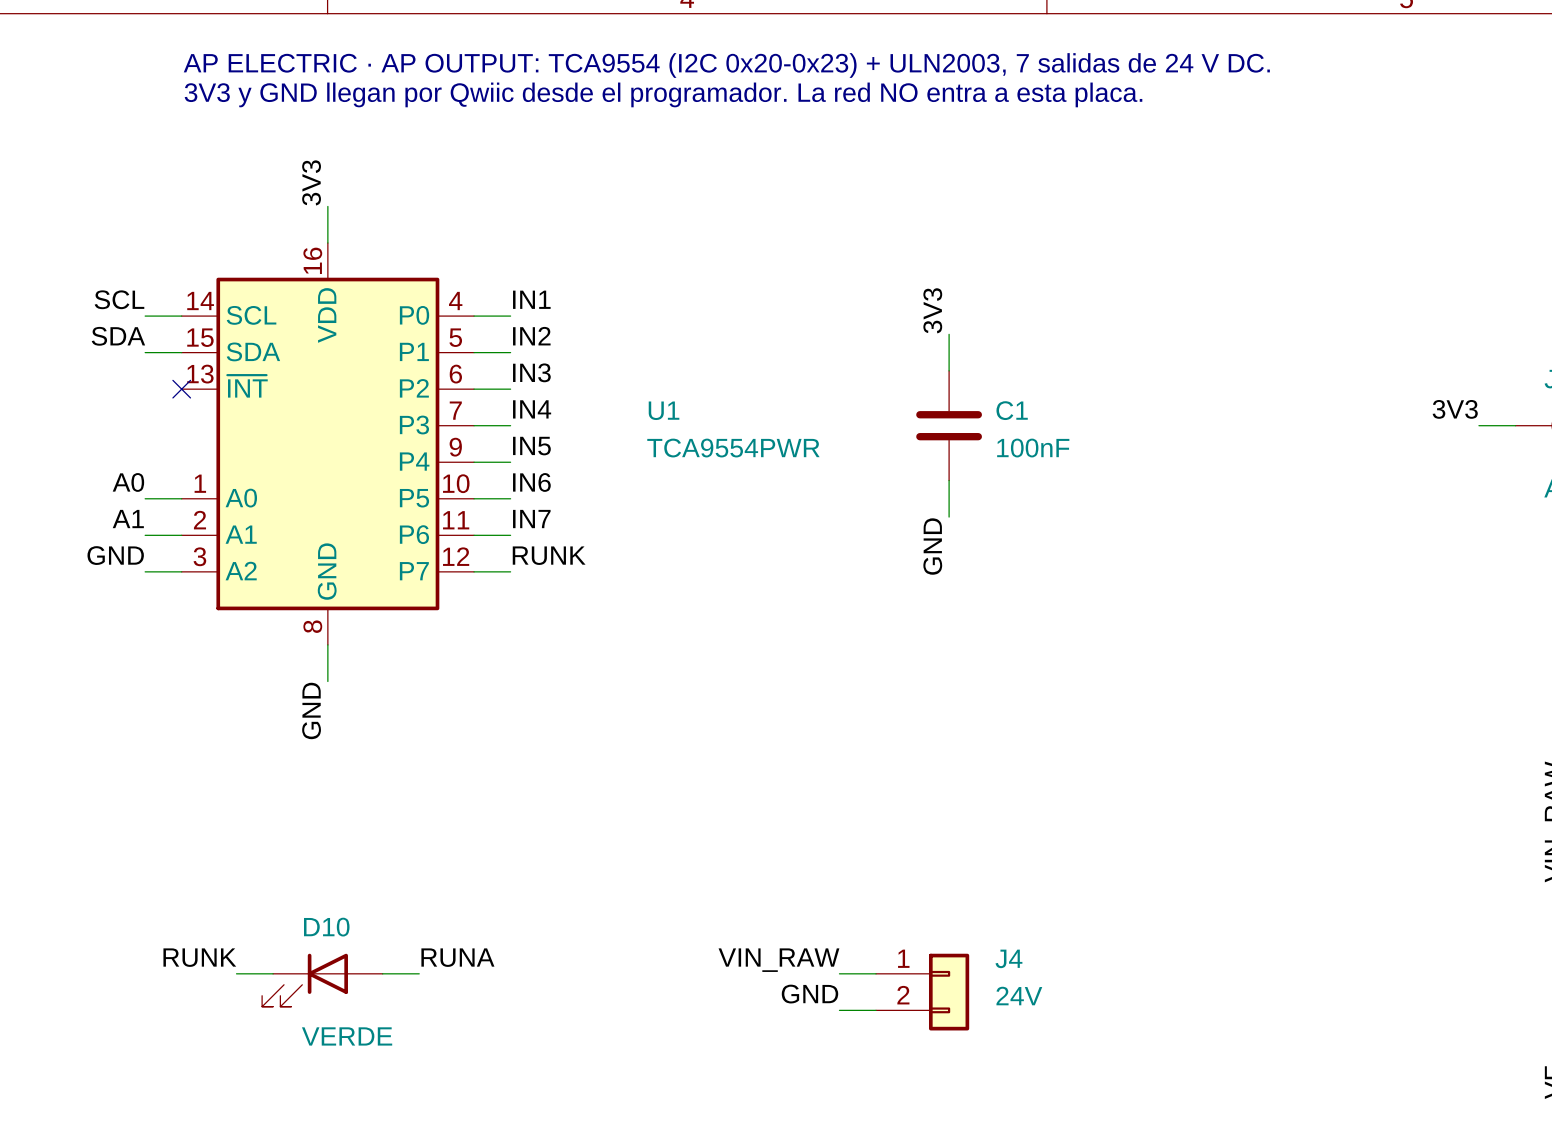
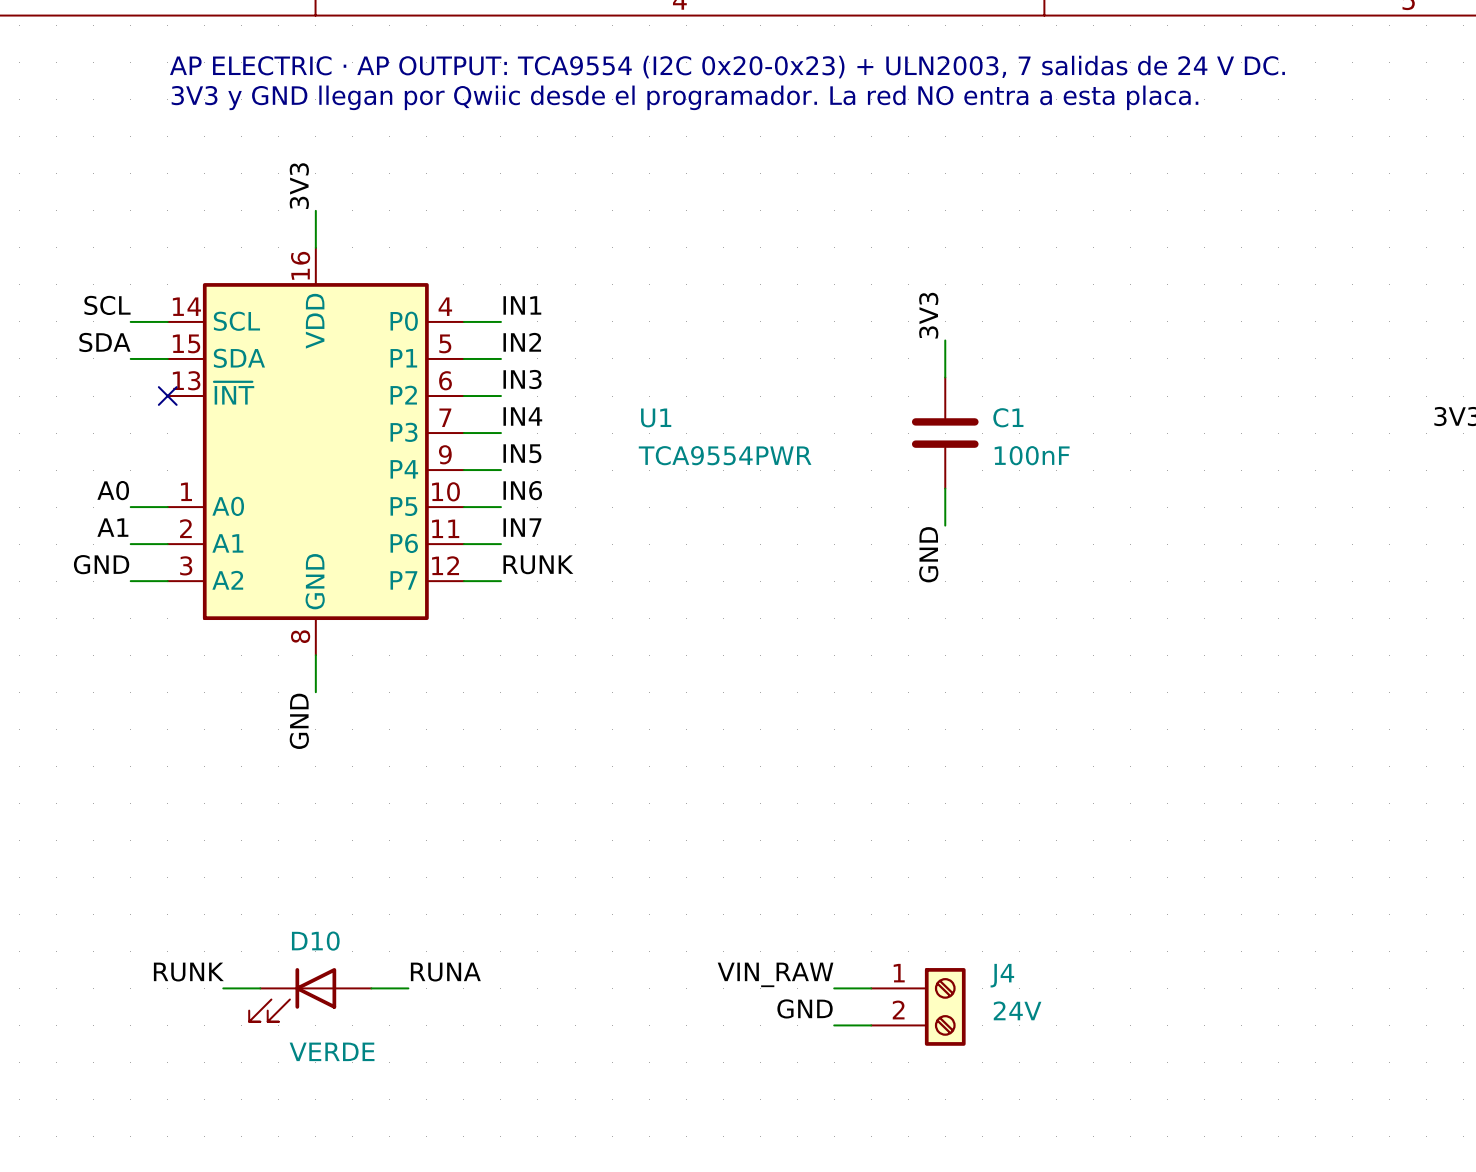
J4 symbol: [876, 953, 970, 1031] -> [871, 968, 966, 1046]

